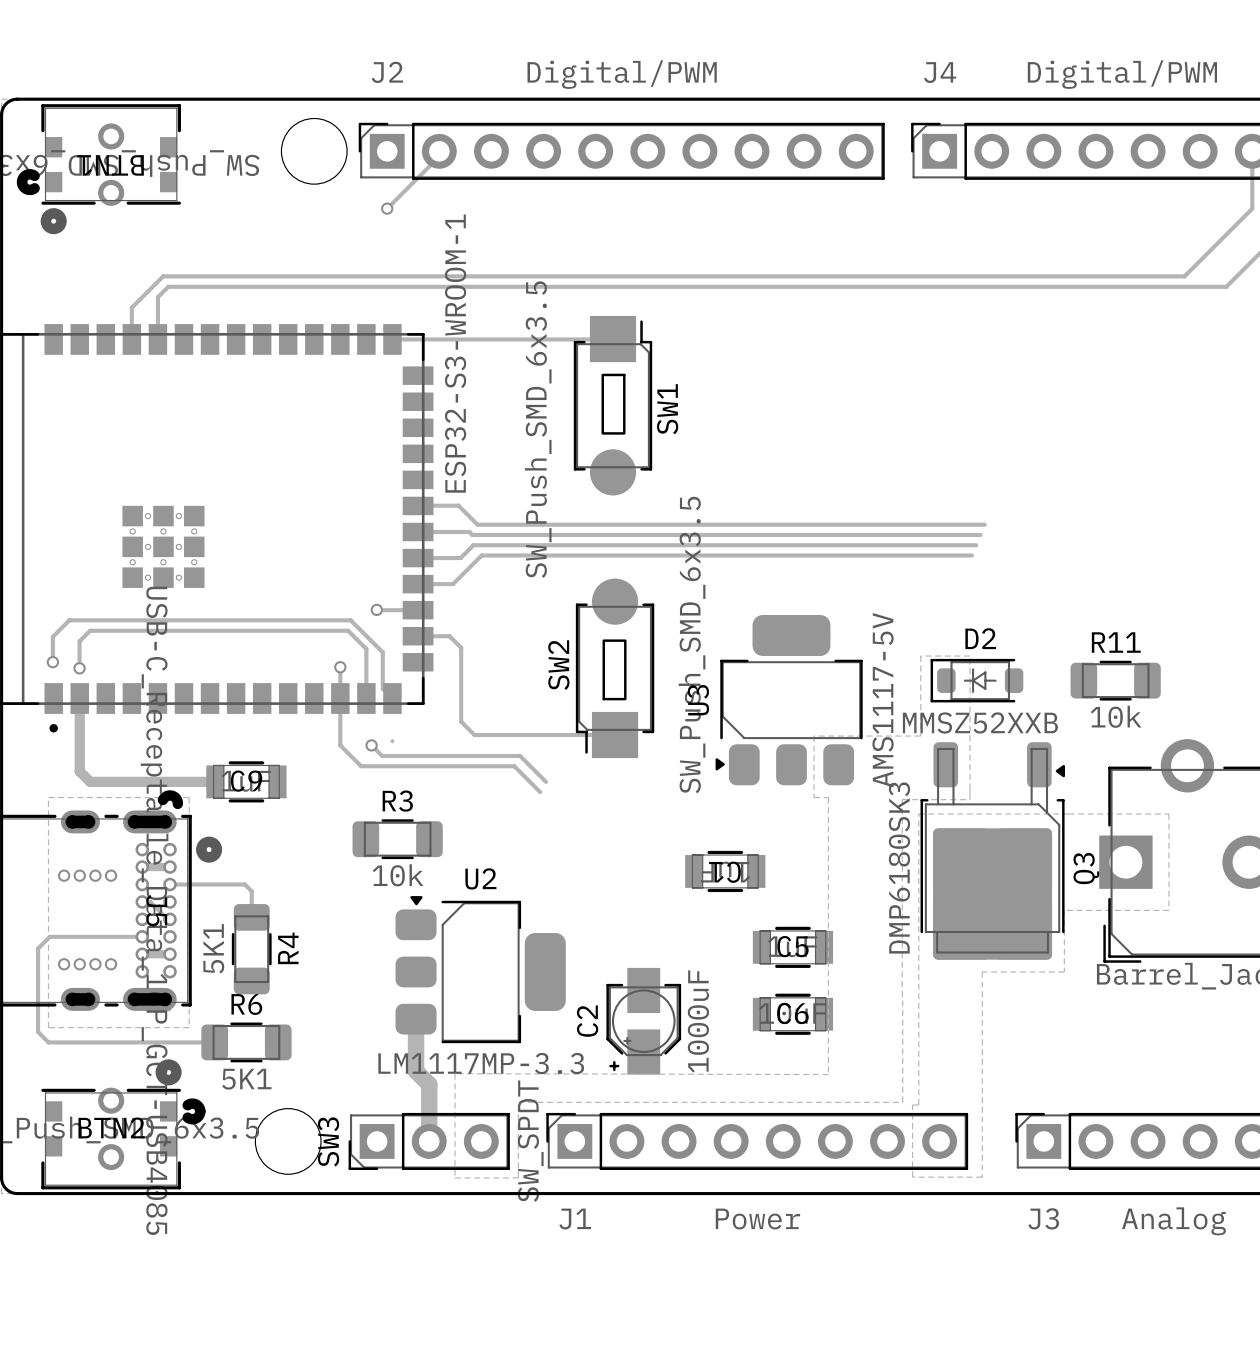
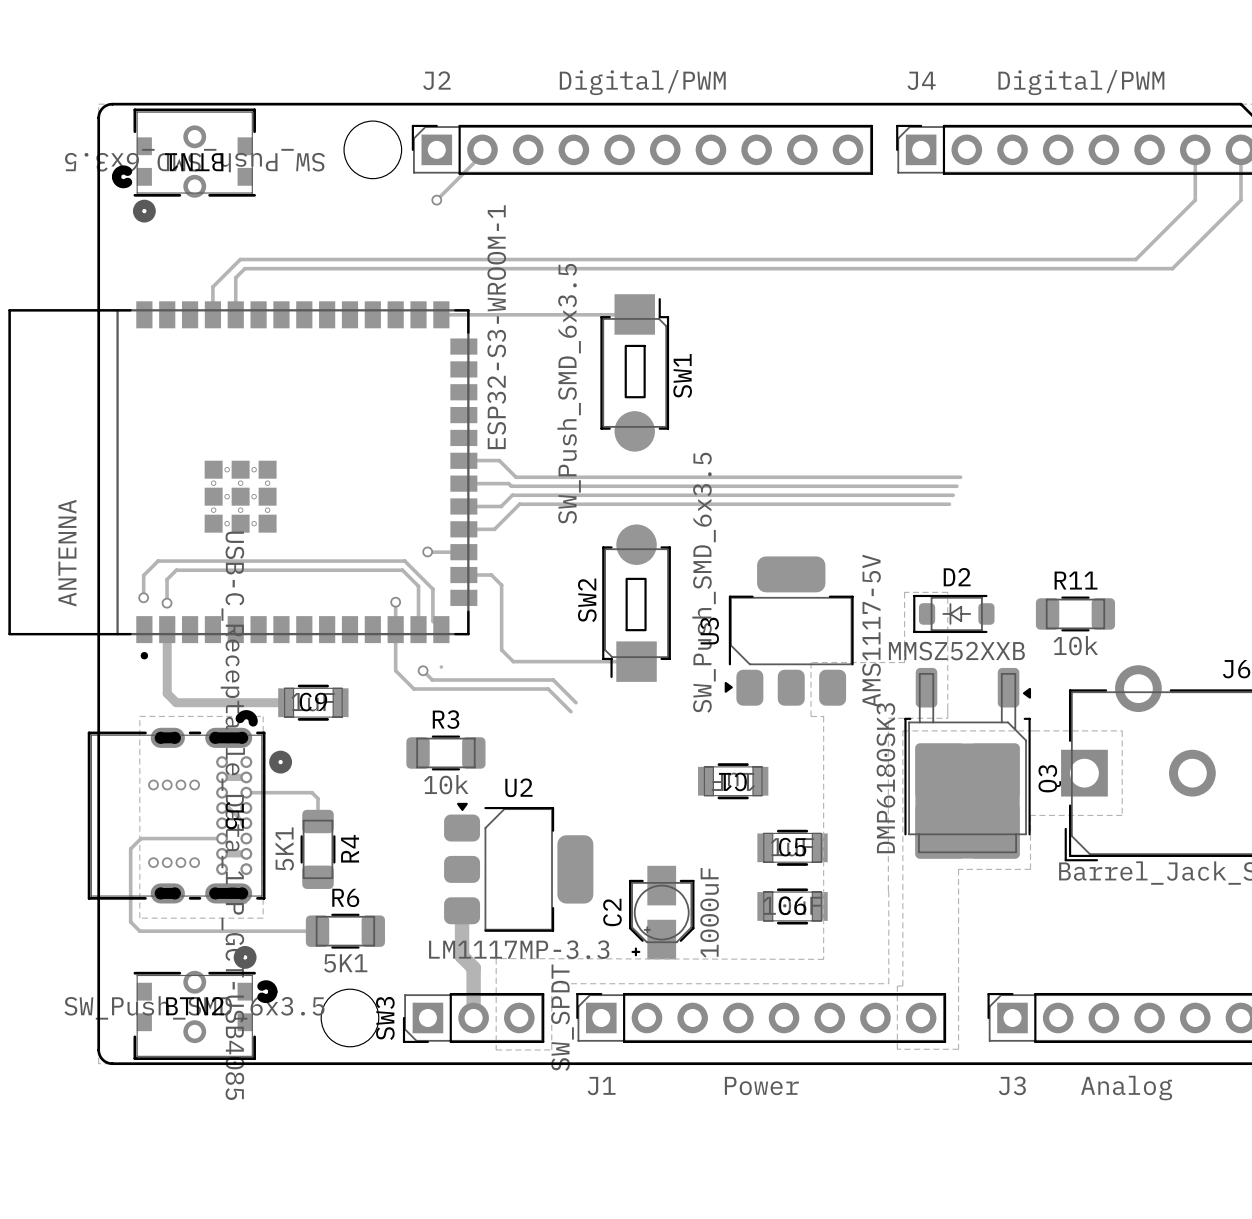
track: none -> (286, 931) (317, 931)
R6 position: (246, 1042) -> (345, 931)

